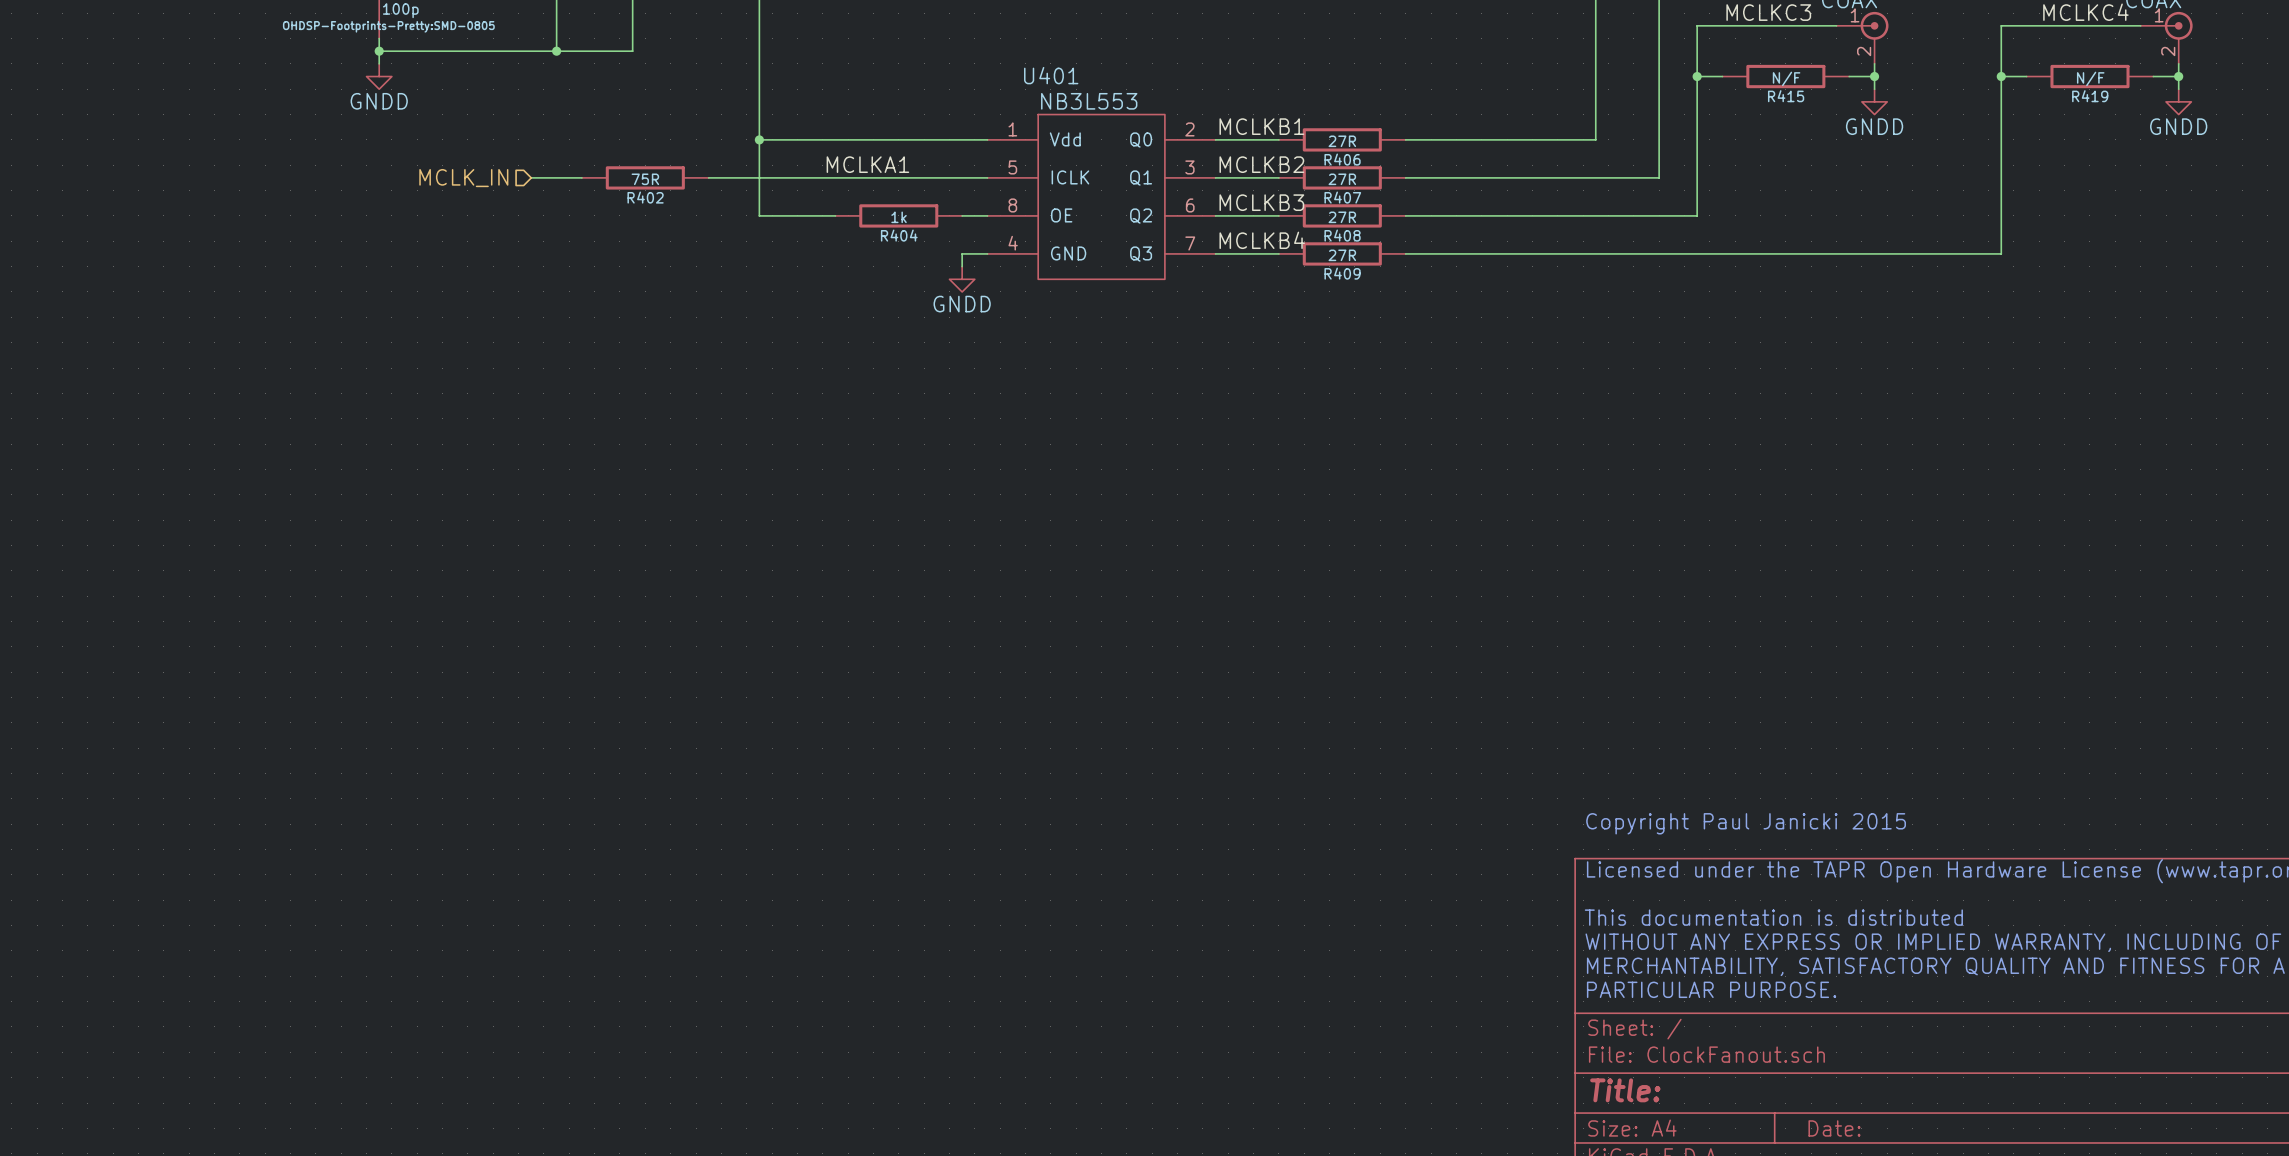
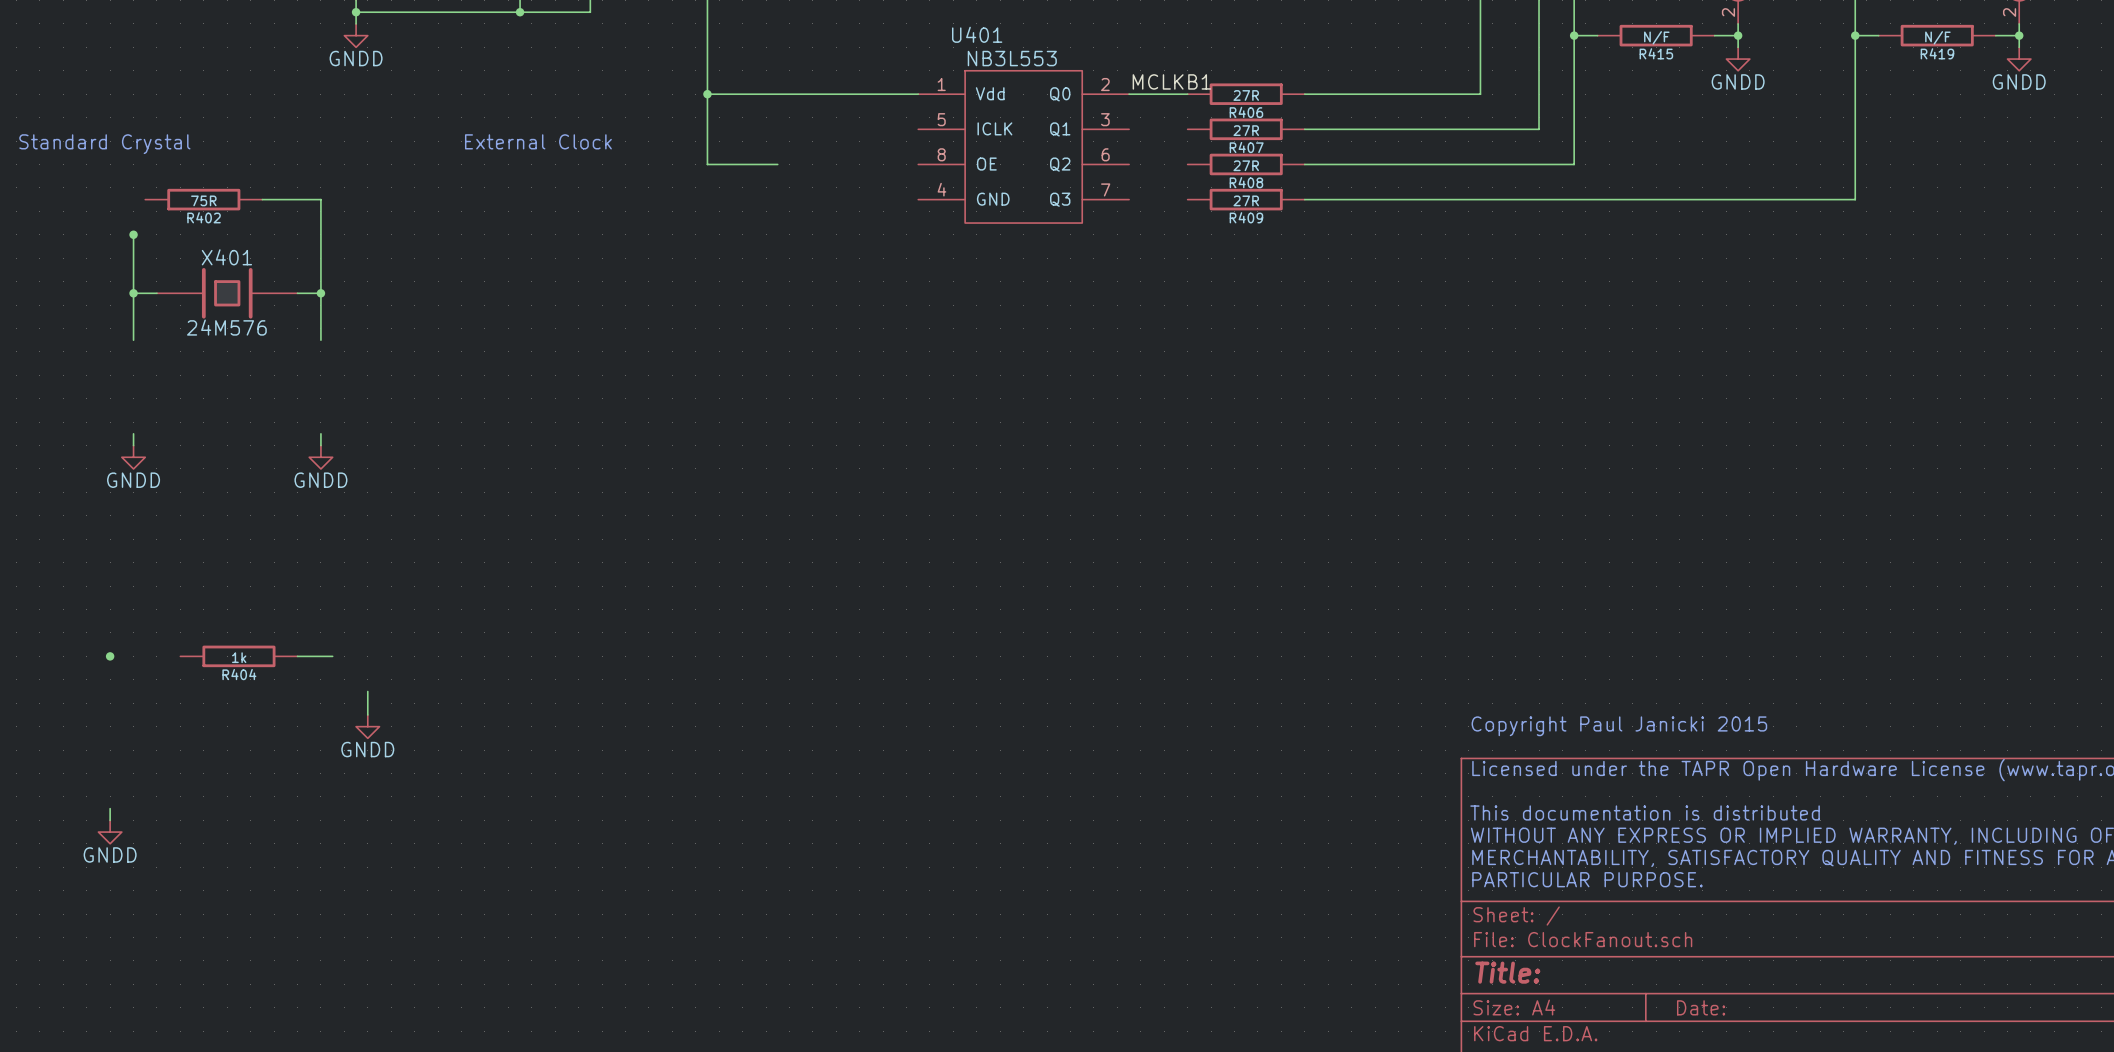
label: MCLKA1 (867, 164) -> none
label: MCLKB2 (1261, 164) -> none
wire: (531, 177) (581, 177) -> none
R402 position: (645, 177) -> (203, 199)
wire: (708, 177) (987, 177) -> none
wire: (1215, 177) (1278, 177) -> none
hierarchical label: MCLK_IN (463, 178) -> none
text: none -> External Clock (538, 141)
text: none -> Standard Crystal (104, 144)
label: MCLKB3 (1261, 202) -> none
R404 position: (898, 215) -> (238, 656)
wire: (962, 215) (987, 215) -> none
wire: (1215, 215) (1278, 215) -> none
label: MCLKB4 (1262, 240) -> none
wire: none -> (262, 199) (320, 199) (320, 340)
wire: (987, 253) (962, 253) (962, 266) -> none
wire: (1215, 253) (1278, 253) -> none
power symbol: GNDD (962, 279) -> none
wire: none -> (133, 234) (133, 340)
junction: none -> (133, 234)
wire: none -> (133, 293) (156, 293)
junction: none -> (133, 293)
X401: none -> 24M576 (227, 293)
wire: none -> (297, 293) (320, 293)
junction: none -> (320, 293)
wire: none -> (133, 433) (133, 445)
wire: none -> (320, 433) (320, 445)
power symbol: none -> GNDD (133, 457)
power symbol: none -> GNDD (320, 457)
junction: none -> (110, 656)
wire: none -> (297, 656) (332, 656)
wire: none -> (367, 691) (367, 714)
power symbol: none -> GNDD (367, 726)
wire: none -> (110, 808) (110, 820)
power symbol: none -> GNDD (110, 832)

